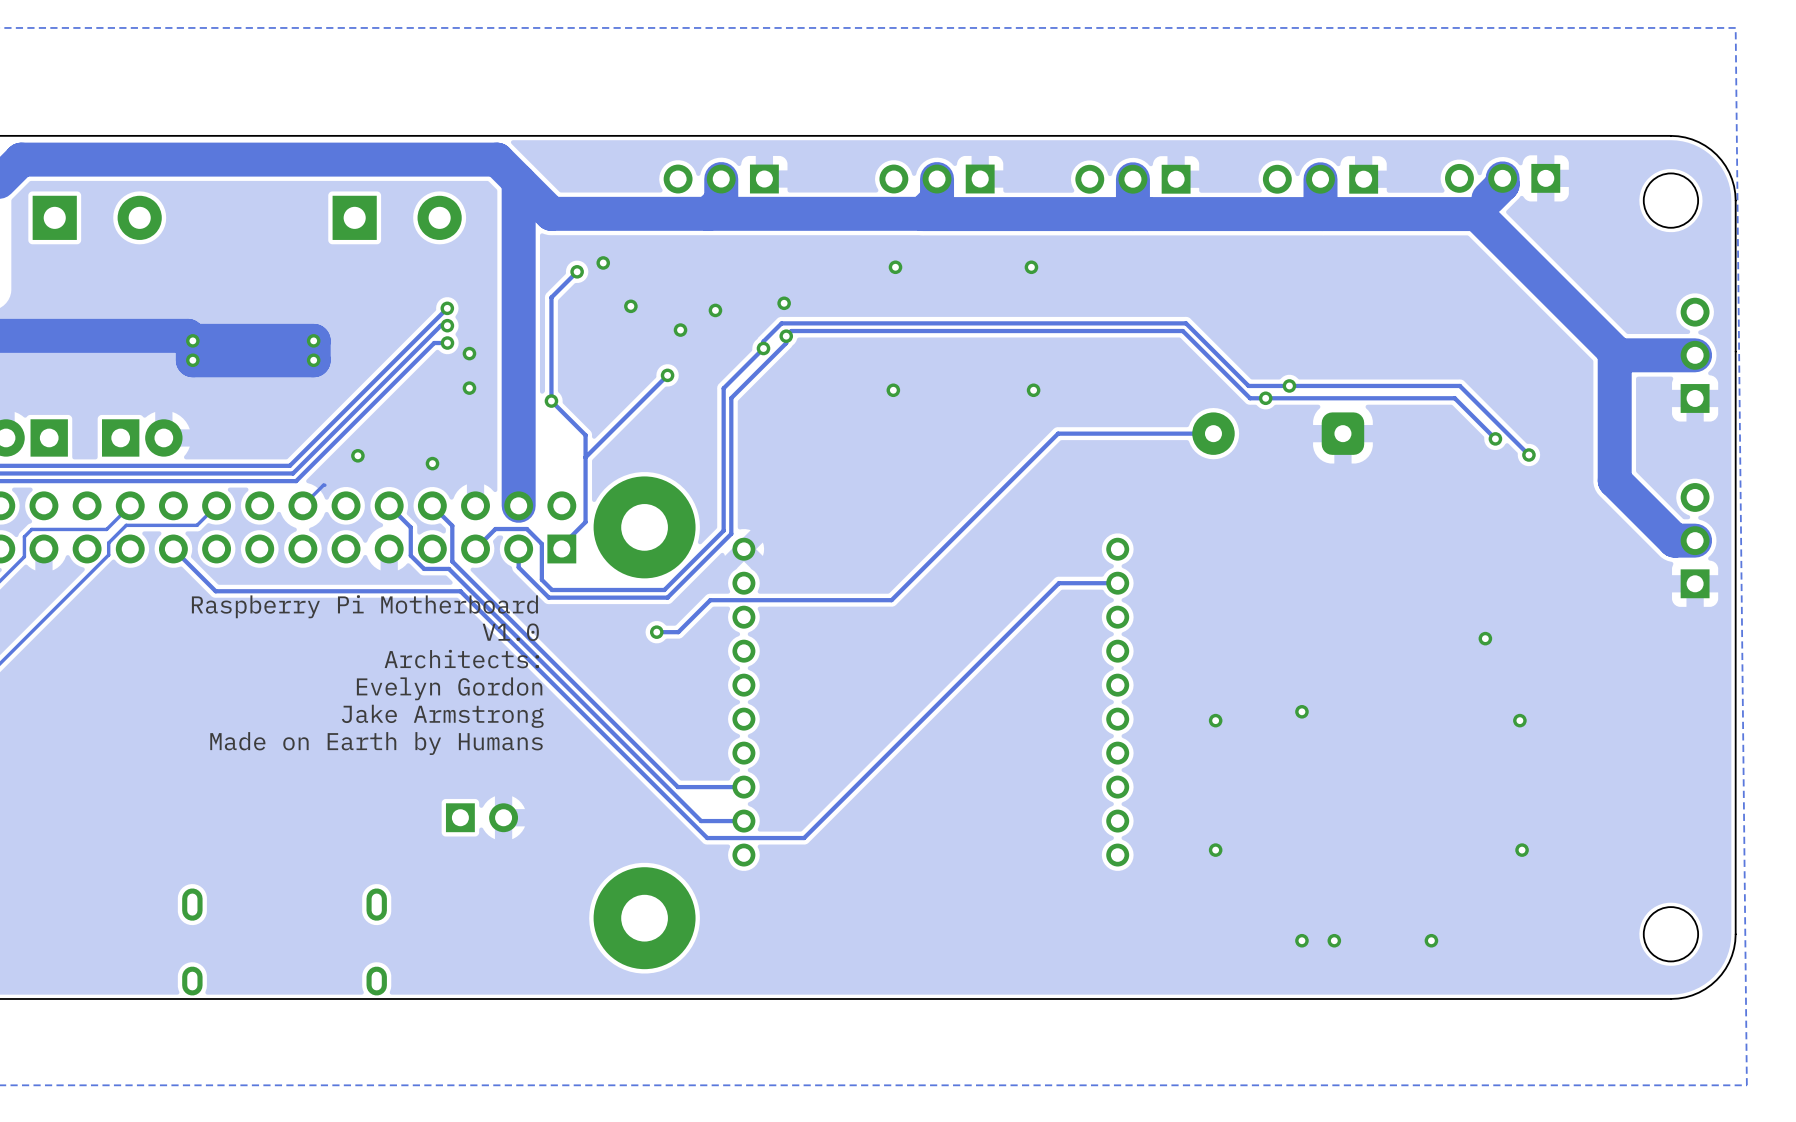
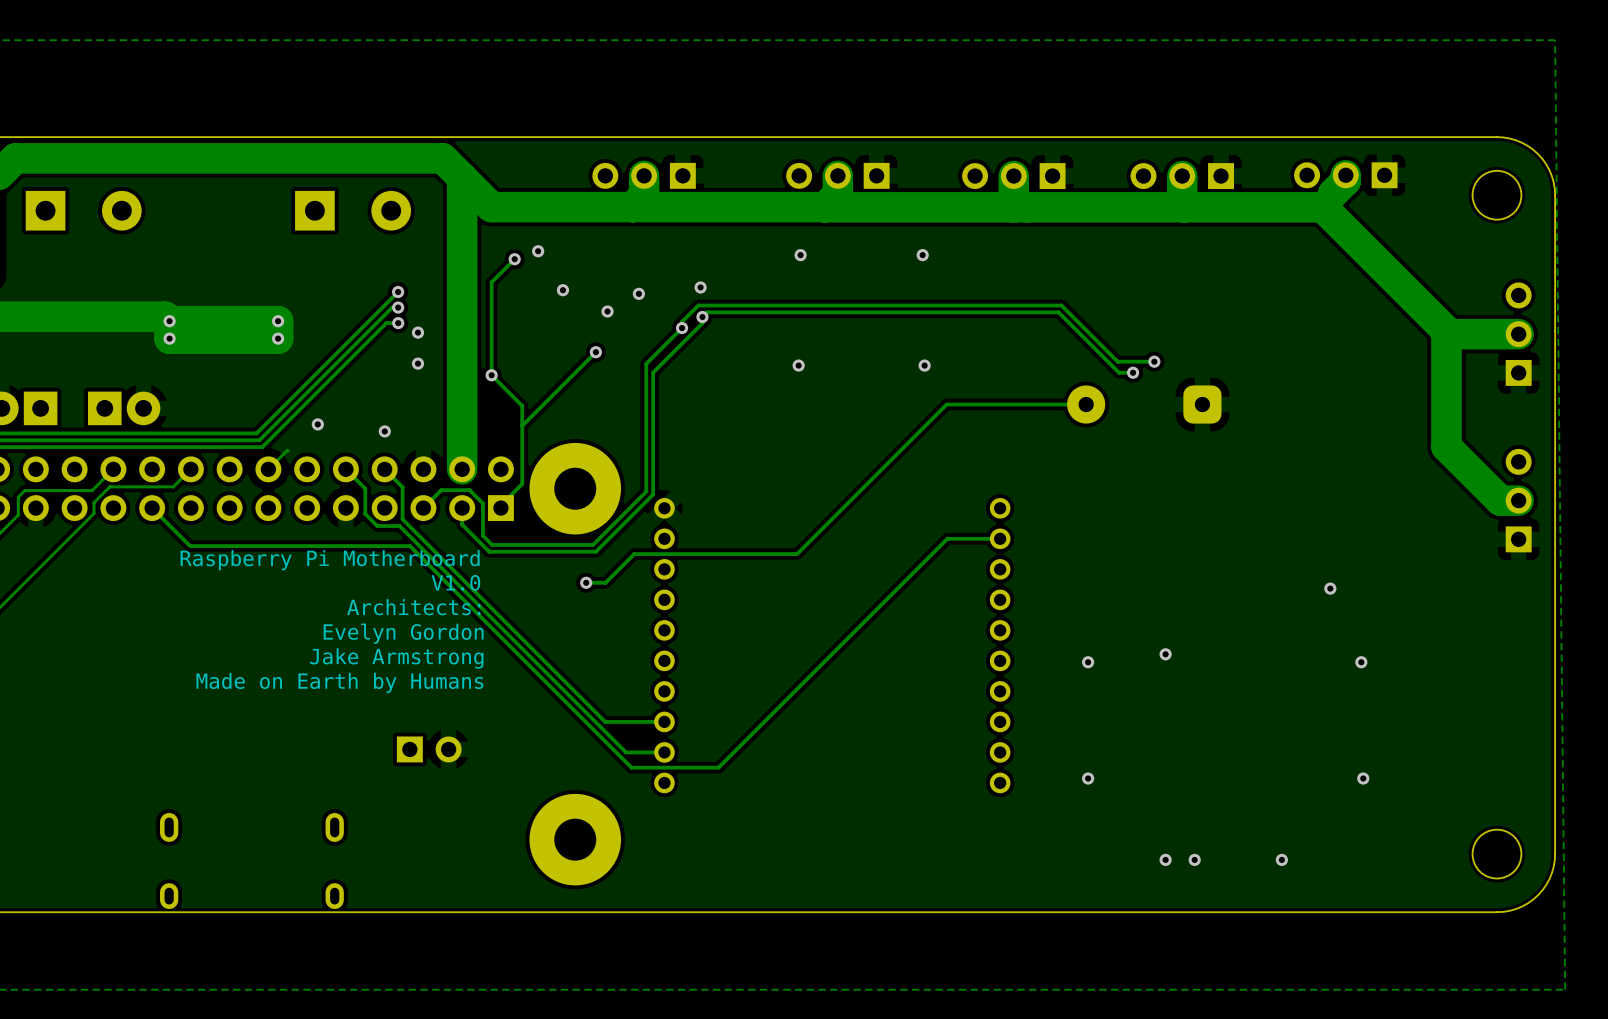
track: (1289, 385) (1459, 385) (1528, 455) -> none
track: (1265, 398) (1454, 398) (1495, 438) -> none
via: (1495, 438) -> none
via: (1528, 455) -> none

